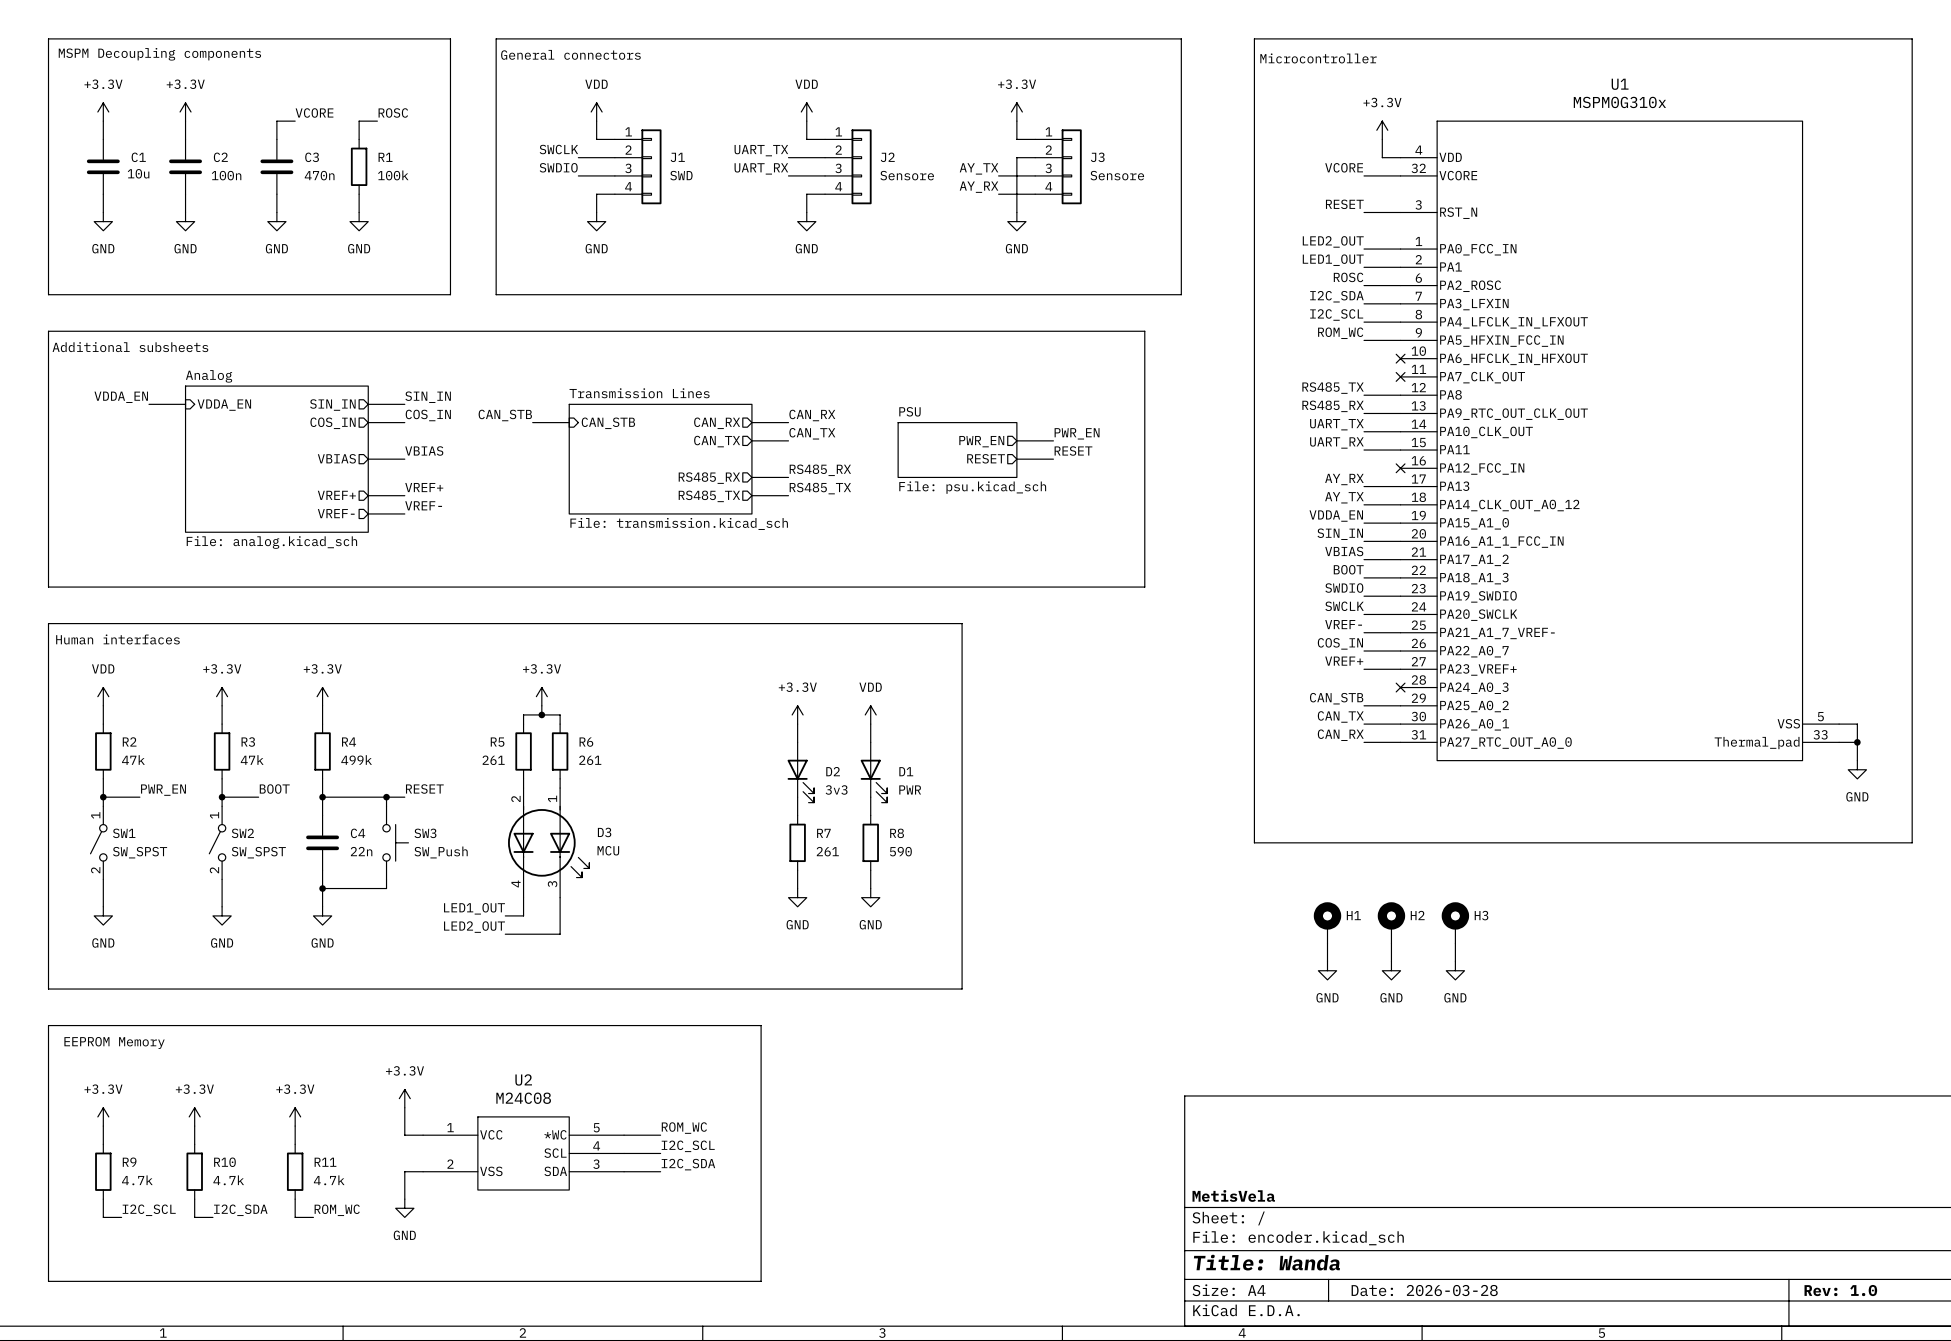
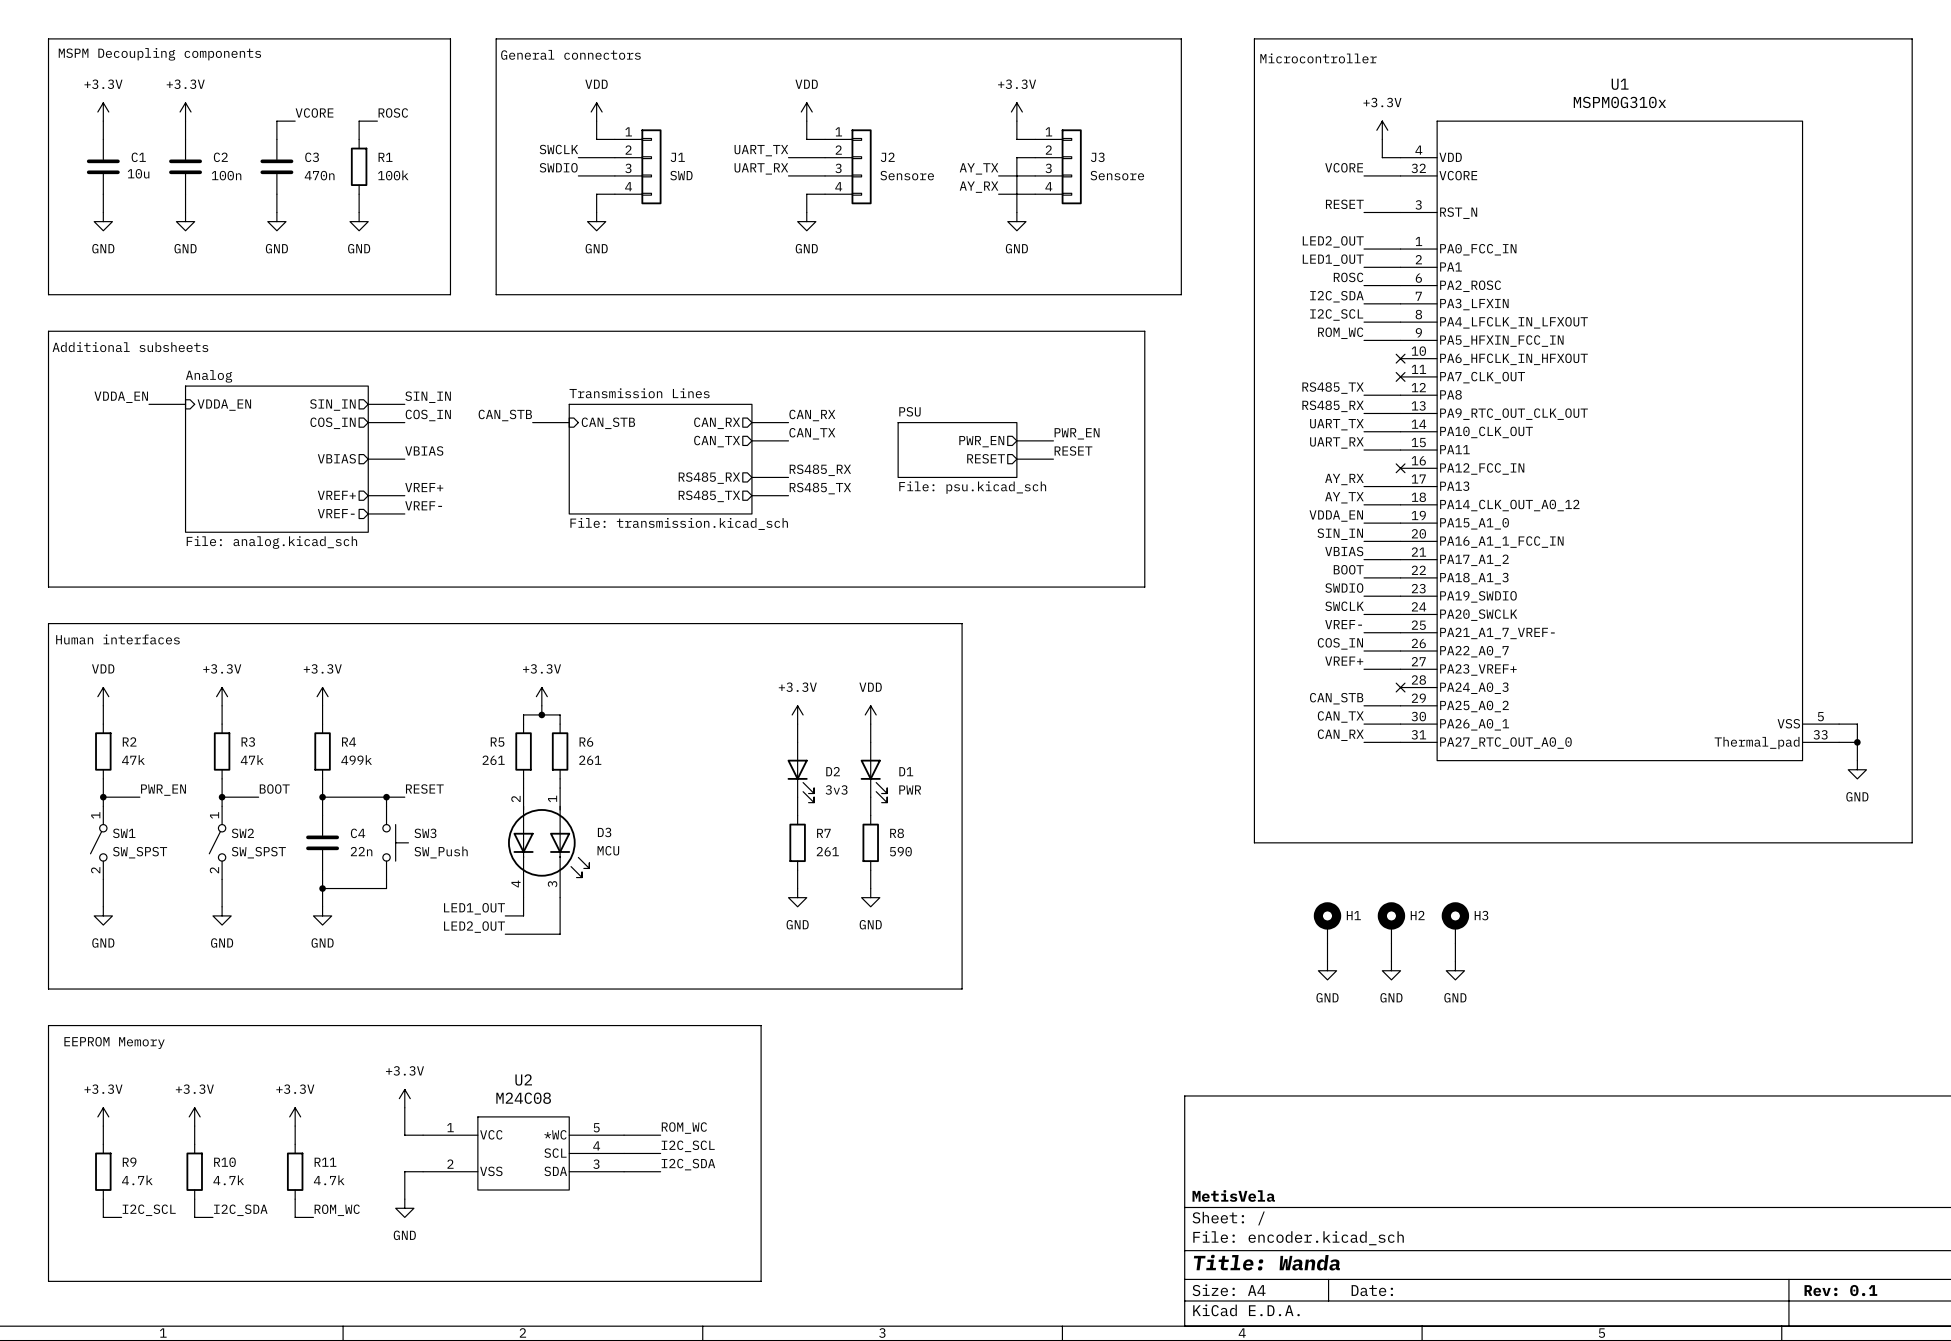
title block: Date: 2026-03-28 (1424, 1290) -> Date: (1372, 1290)
title block: Rev: 1.0 (1840, 1290) -> Rev: 0.1 (1840, 1290)

